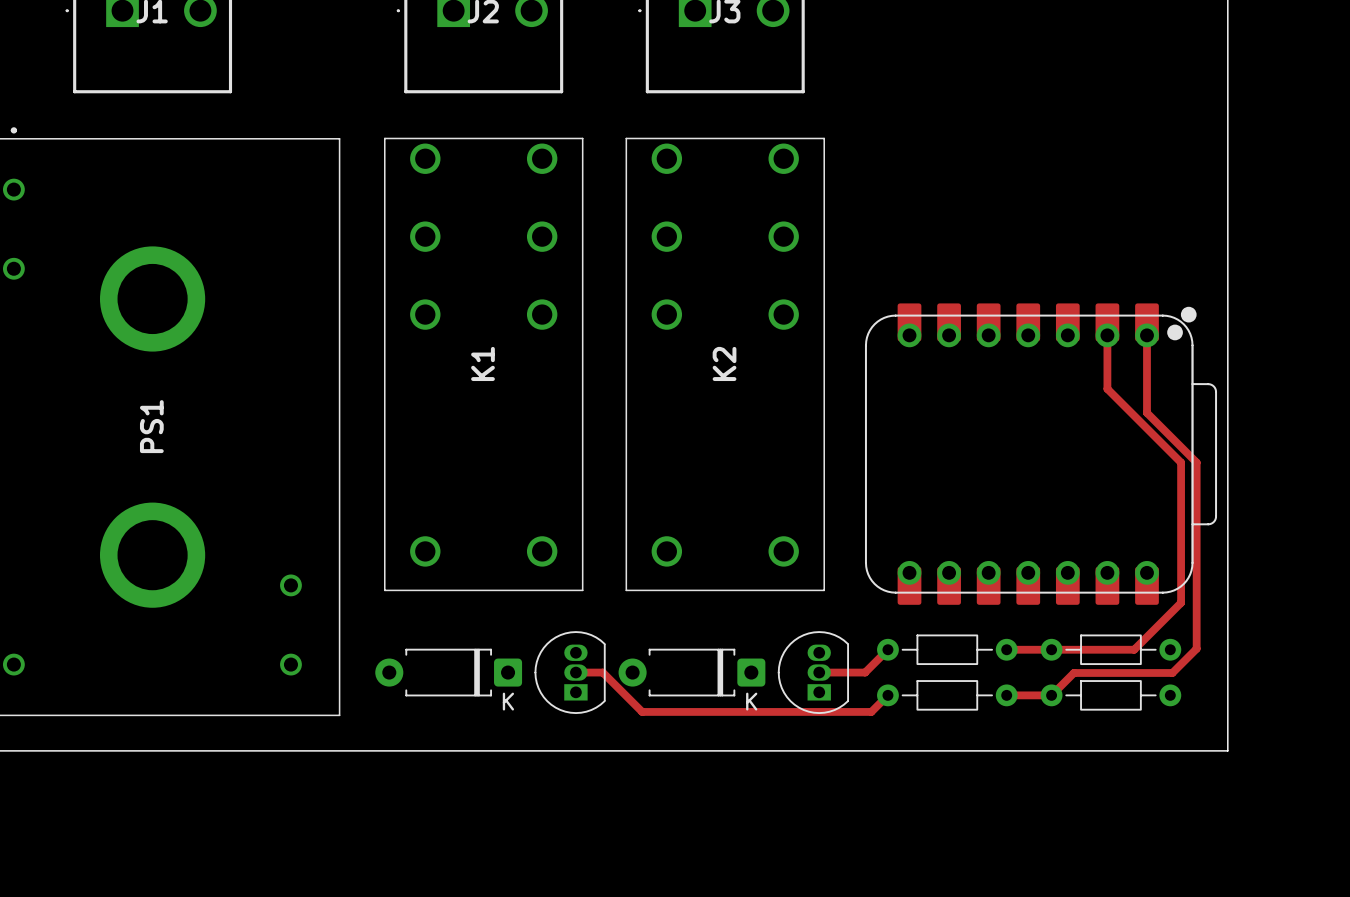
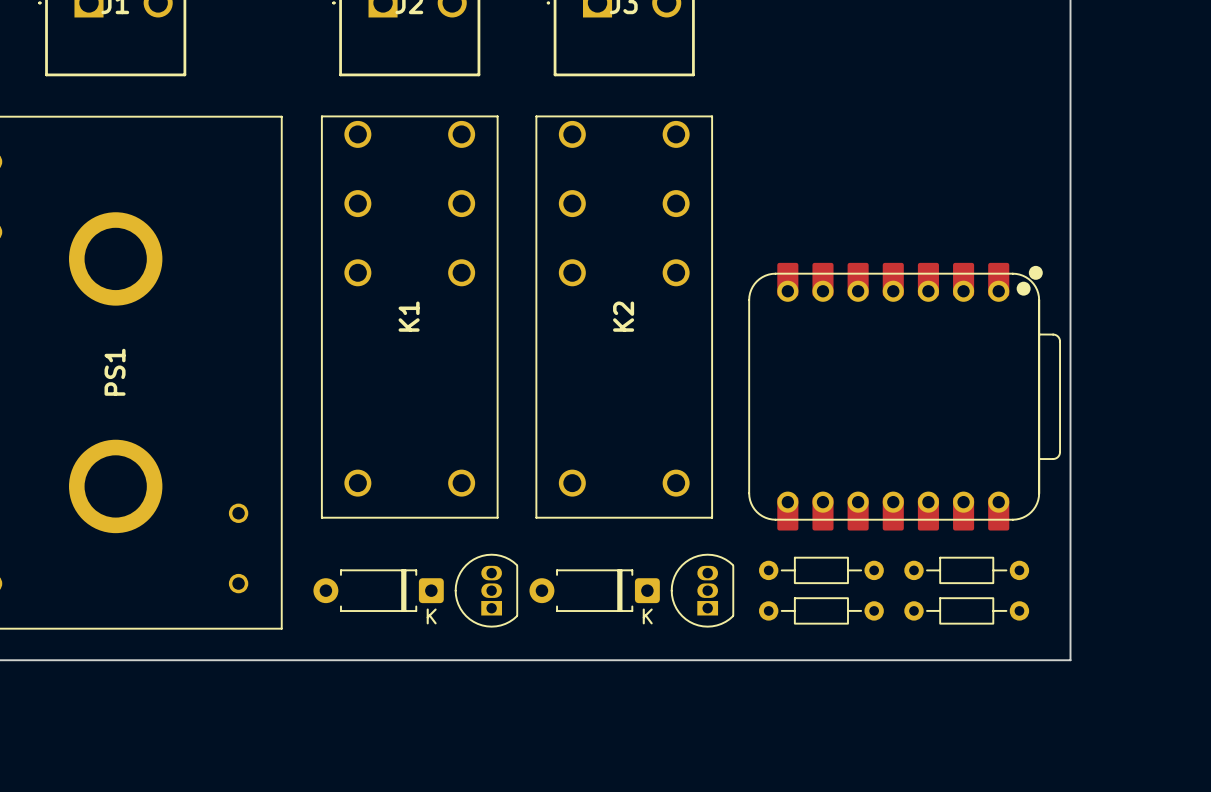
track: (1107, 335) (1107, 388) (1181, 462) (1181, 602) (1134, 649) (1006, 649) -> none
track: (1146, 335) (1146, 412) (1196, 462) (1196, 648) (1172, 672) (1073, 672) (1051, 695) (1006, 695) -> none
track: (887, 649) (865, 672) (819, 672) -> none
track: (575, 672) (602, 672) (642, 711) (871, 711) (887, 695) -> none

